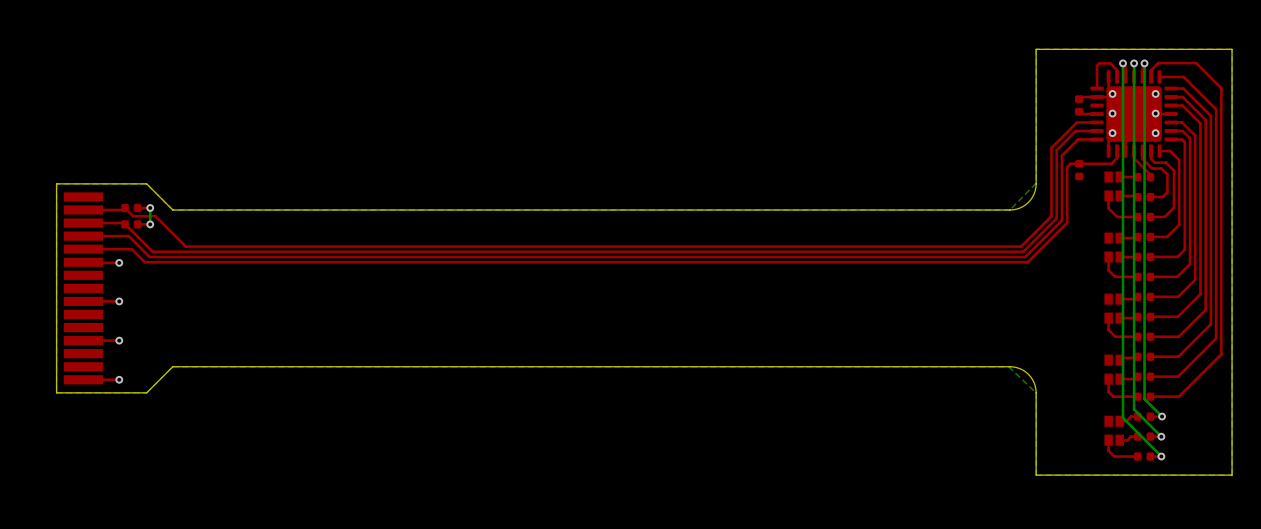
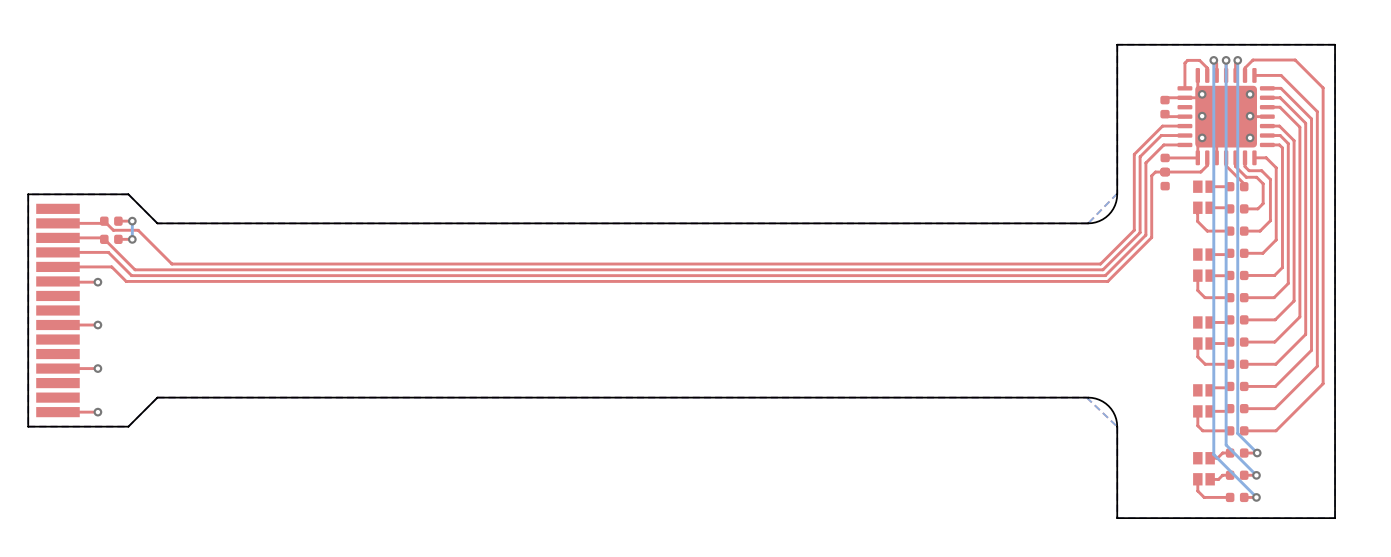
top track: none -> (1197, 157) (1165, 157)
part: none -> (1165, 164)

